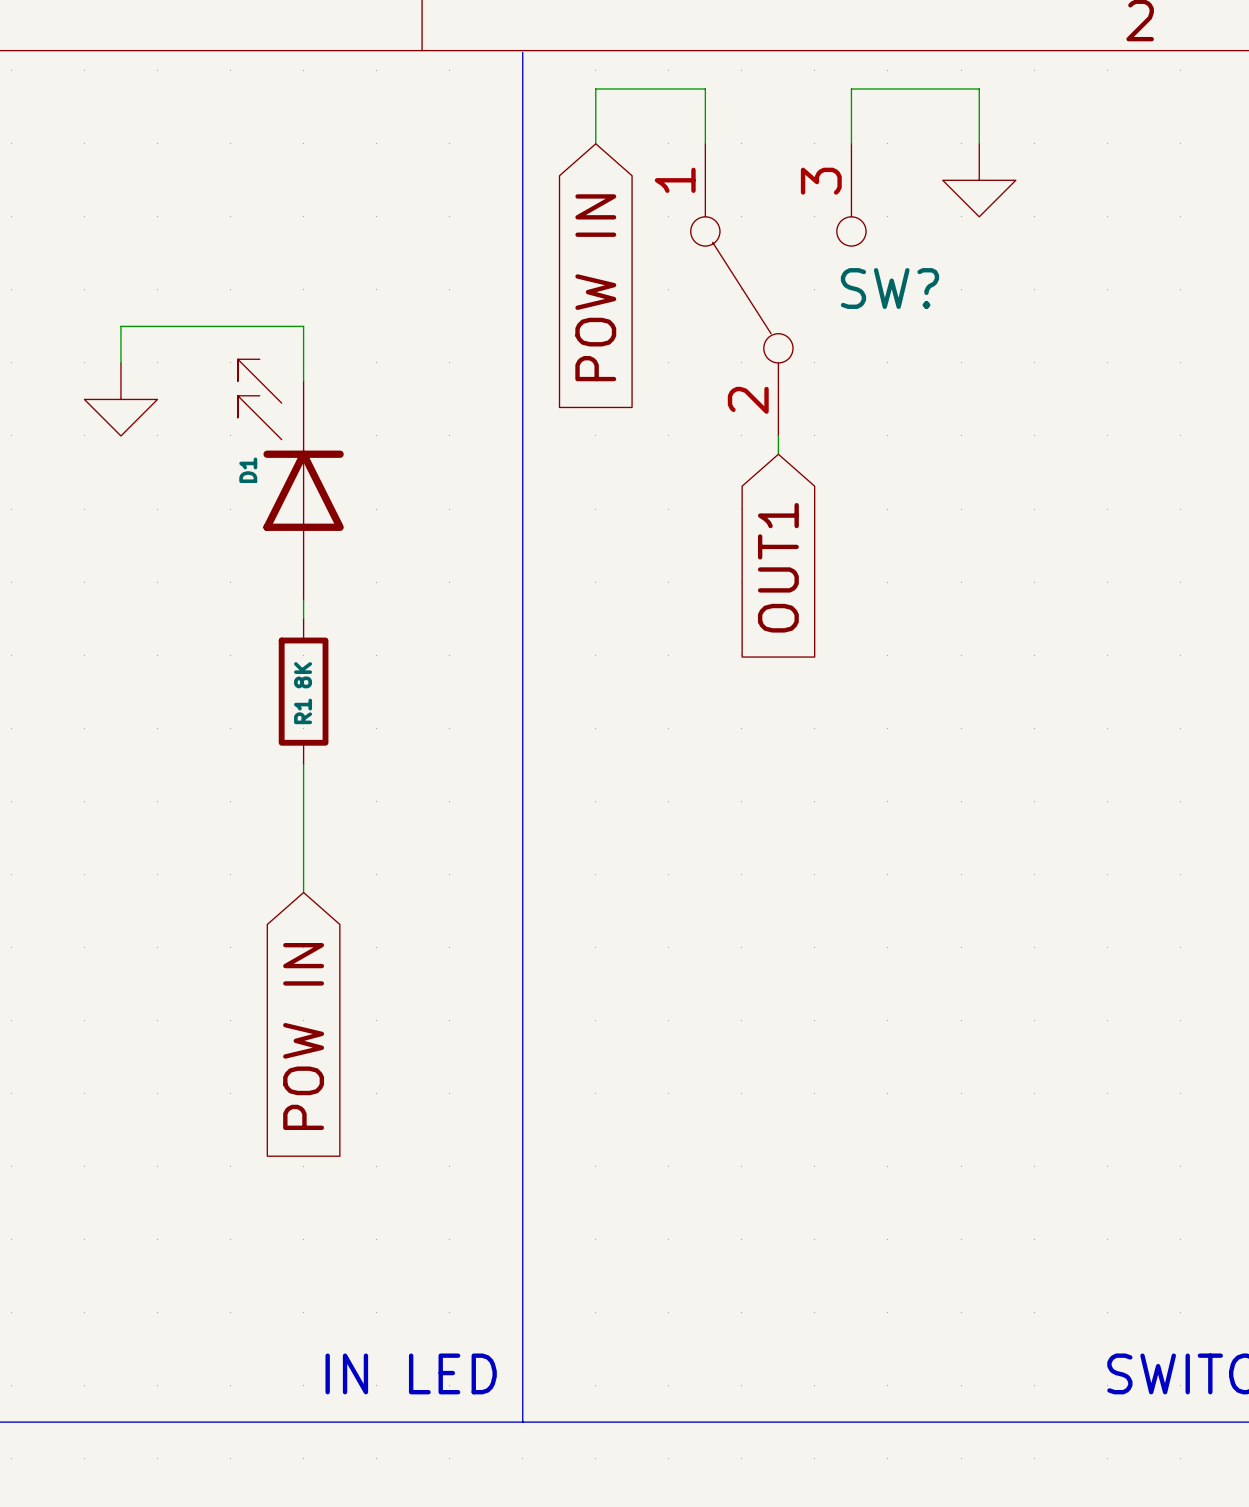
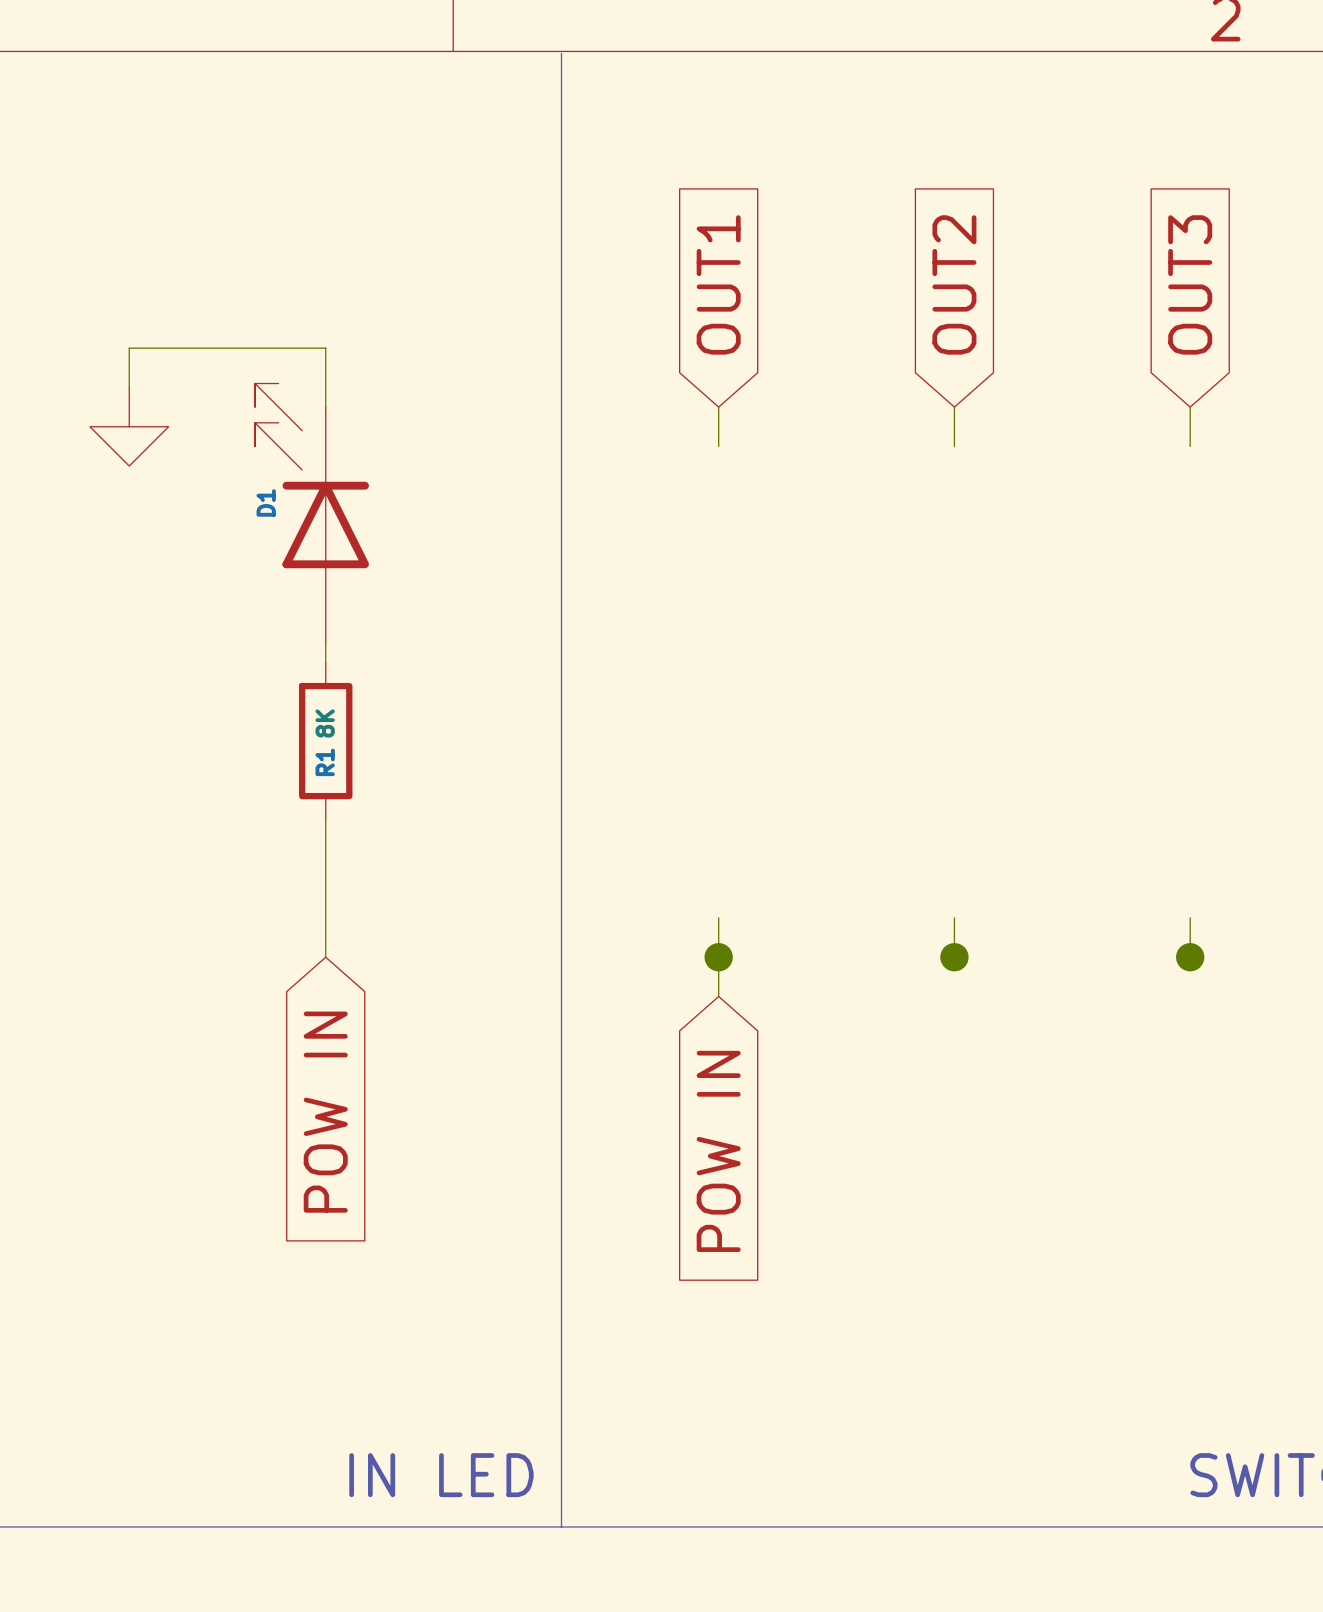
wire: (595, 143) (595, 89) (705, 89) (705, 143) -> none
wire: (851, 143) (851, 89) (979, 89) (979, 143) -> none
power symbol: (979, 180) -> none
global label: none -> OUT2 (954, 284)
global label: none -> OUT3 (1190, 284)
global label: POW IN (595, 287) -> none
SW?: (778, 289) -> none
wire: none -> (718, 407) (718, 446)
wire: none -> (954, 407) (954, 446)
wire: none -> (1190, 407) (1190, 446)
wire: (778, 435) (778, 454) -> none
global label rotation: 0° (778, 567) -> 180° (718, 284)
global label position: OUT1 (778, 567) -> OUT1 (718, 284)
wire: none -> (718, 917) (718, 996)
wire: none -> (954, 917) (954, 957)
wire: none -> (1190, 917) (1190, 957)
junction: none -> (718, 957)
junction: none -> (954, 957)
junction: none -> (1190, 957)
global label: none -> POW IN (718, 1151)

